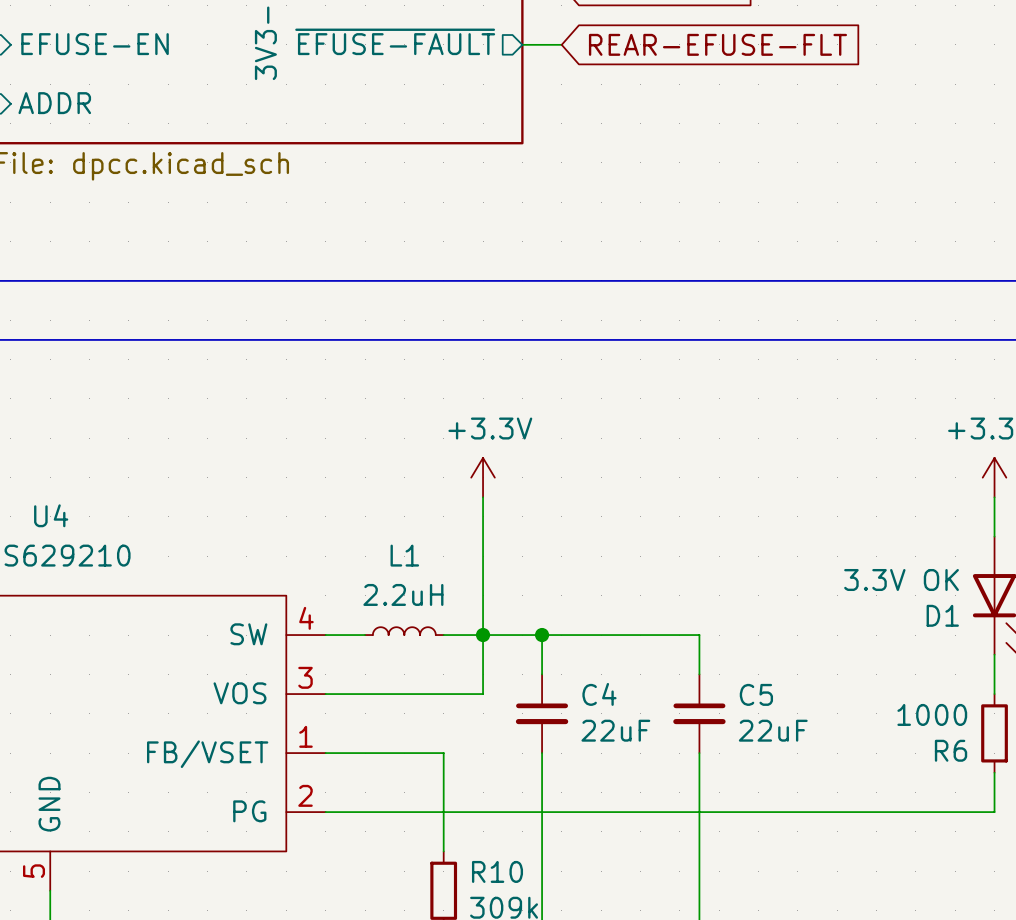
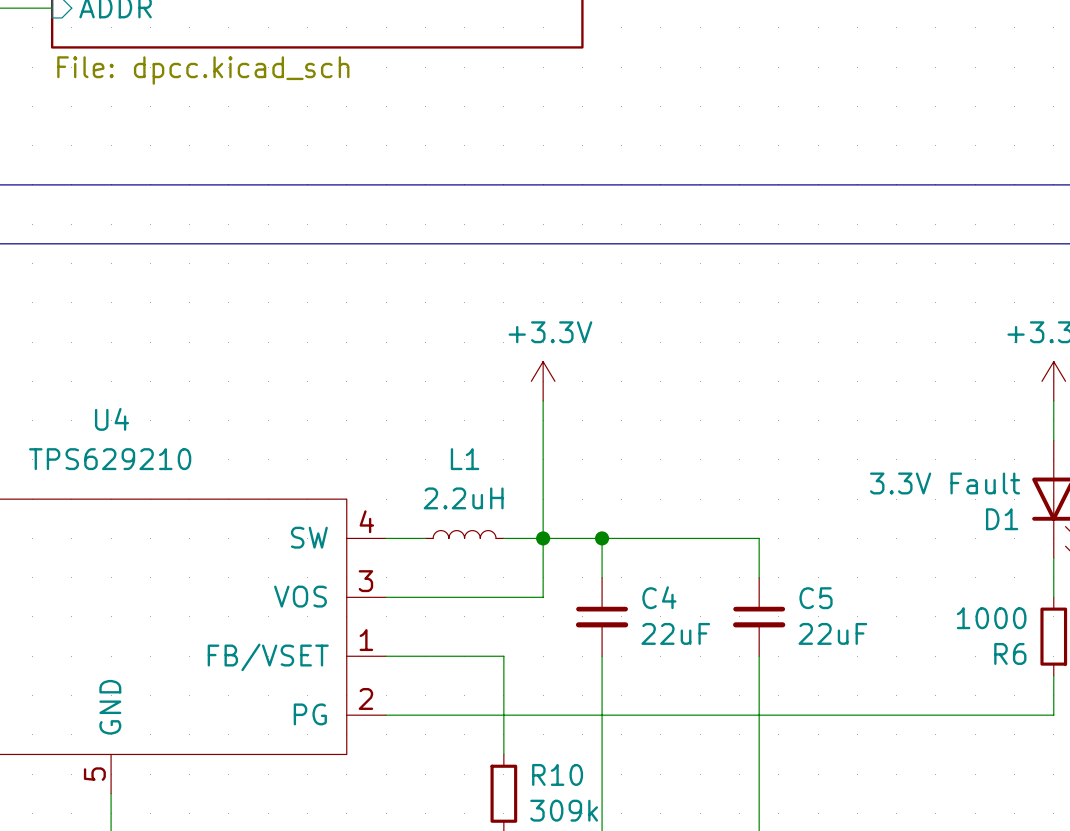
D1 value: 3.3V OK (901, 579) -> 3.3V Fault (945, 483)

